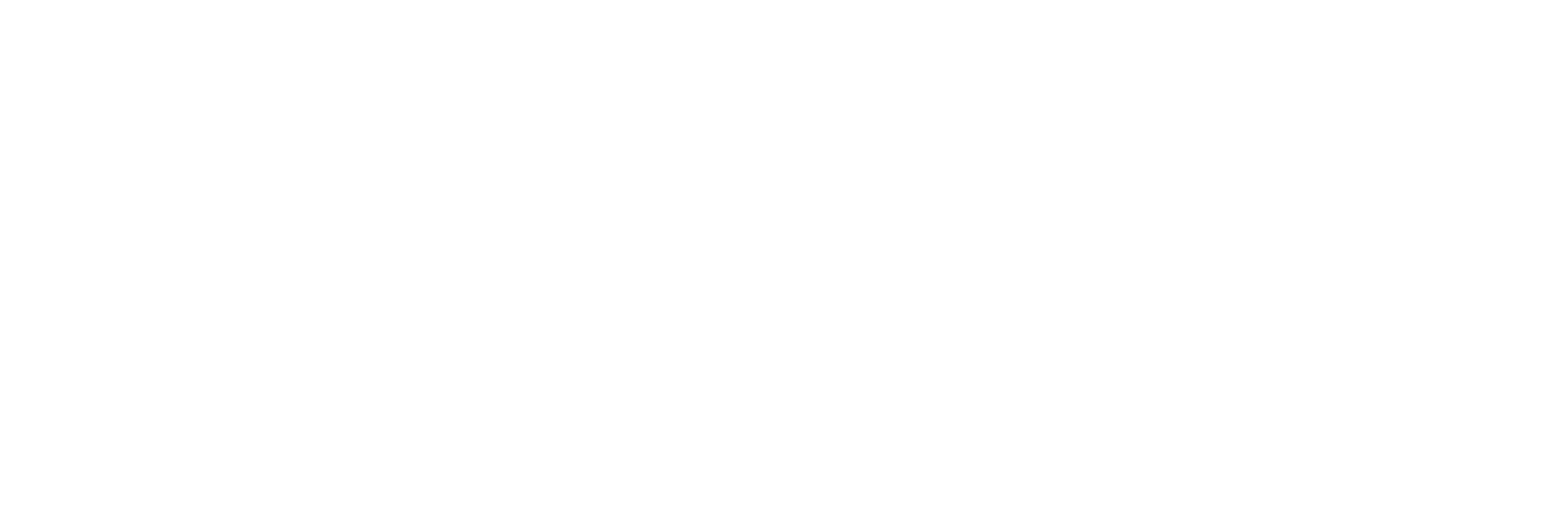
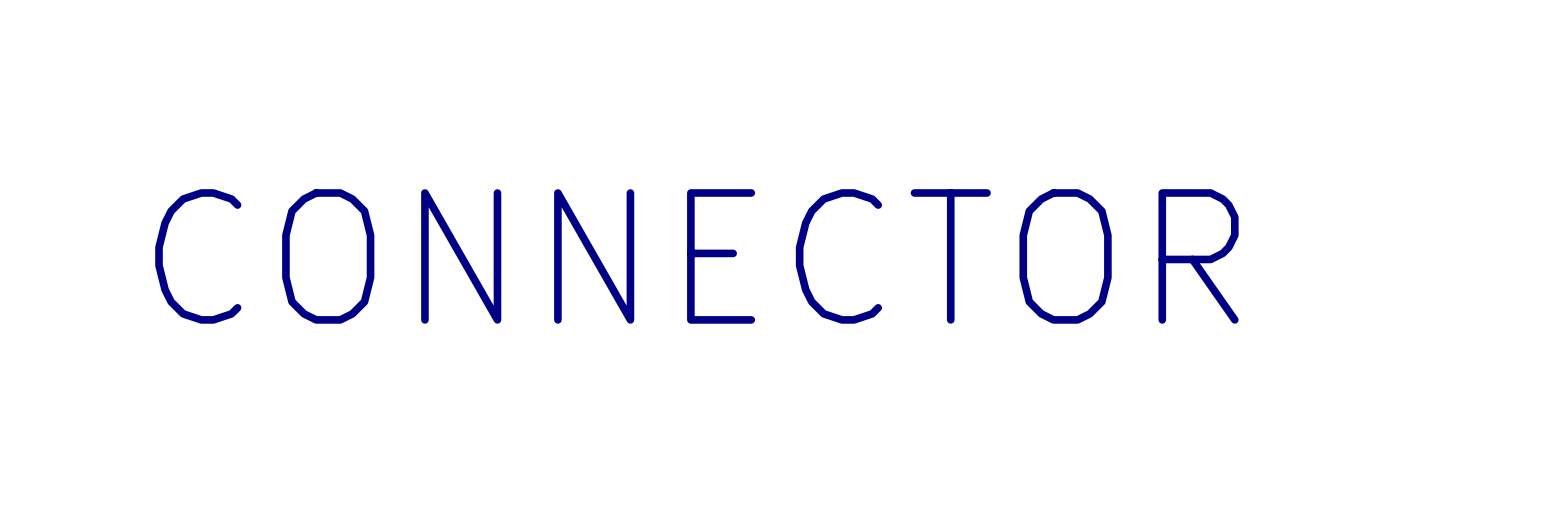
text: none -> CONNECTOR (696, 256)

